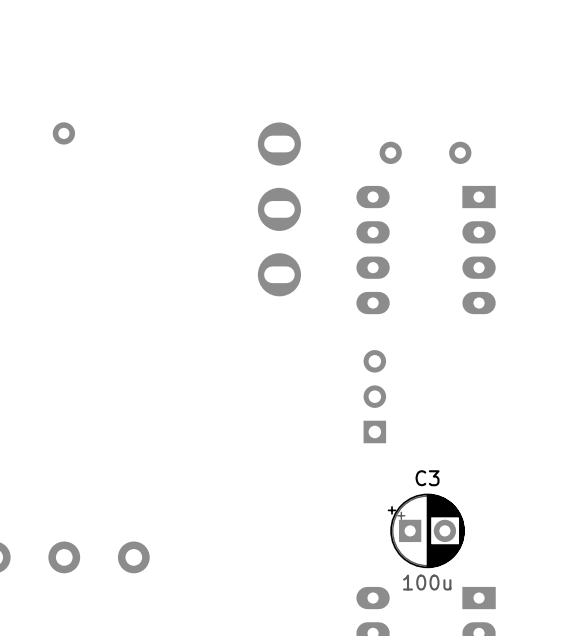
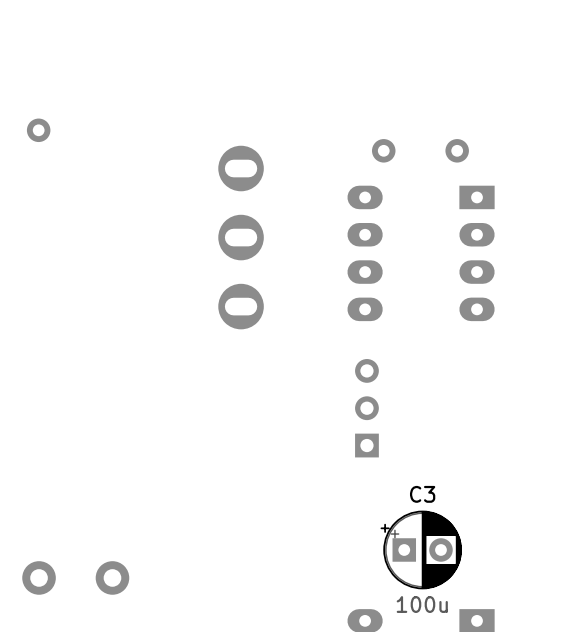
part position: (279, 209) -> (241, 237)

